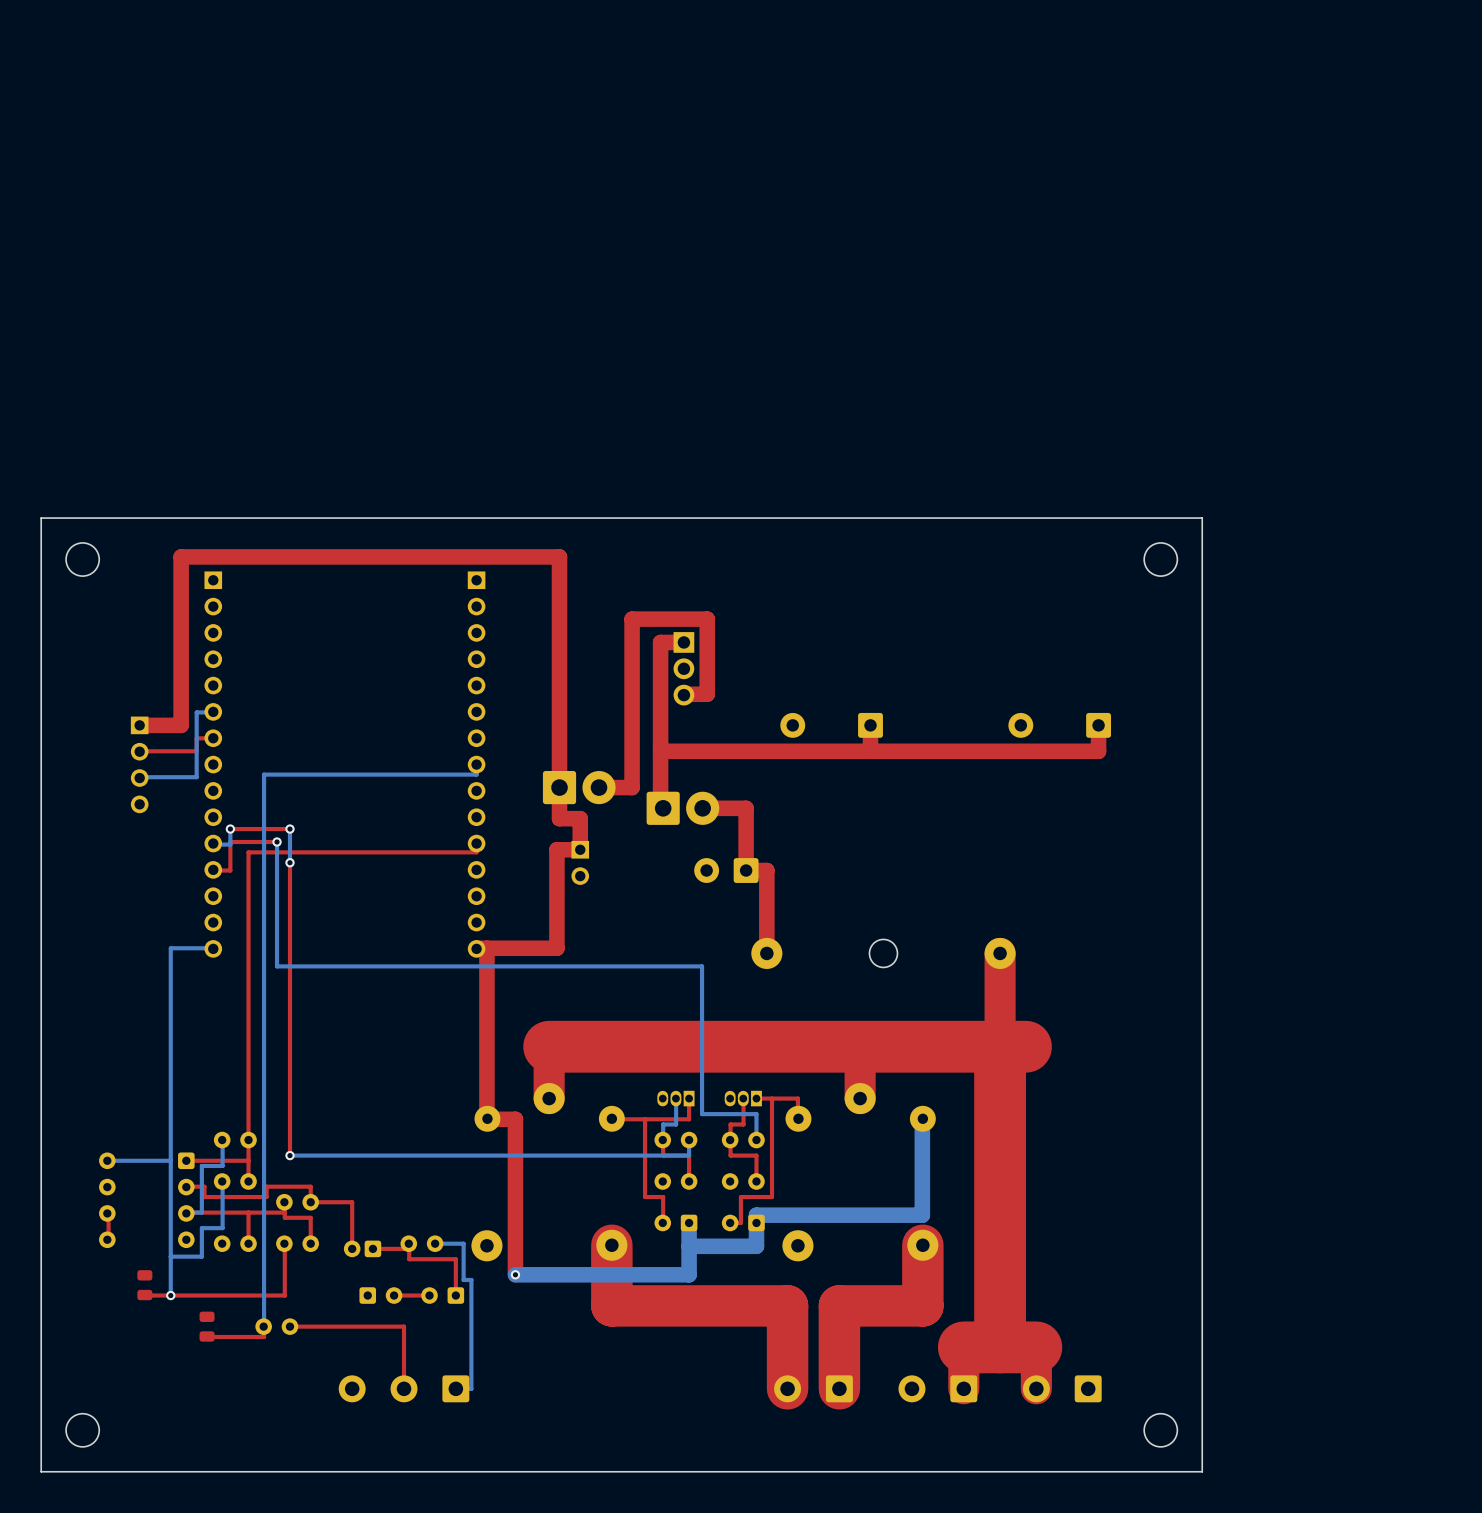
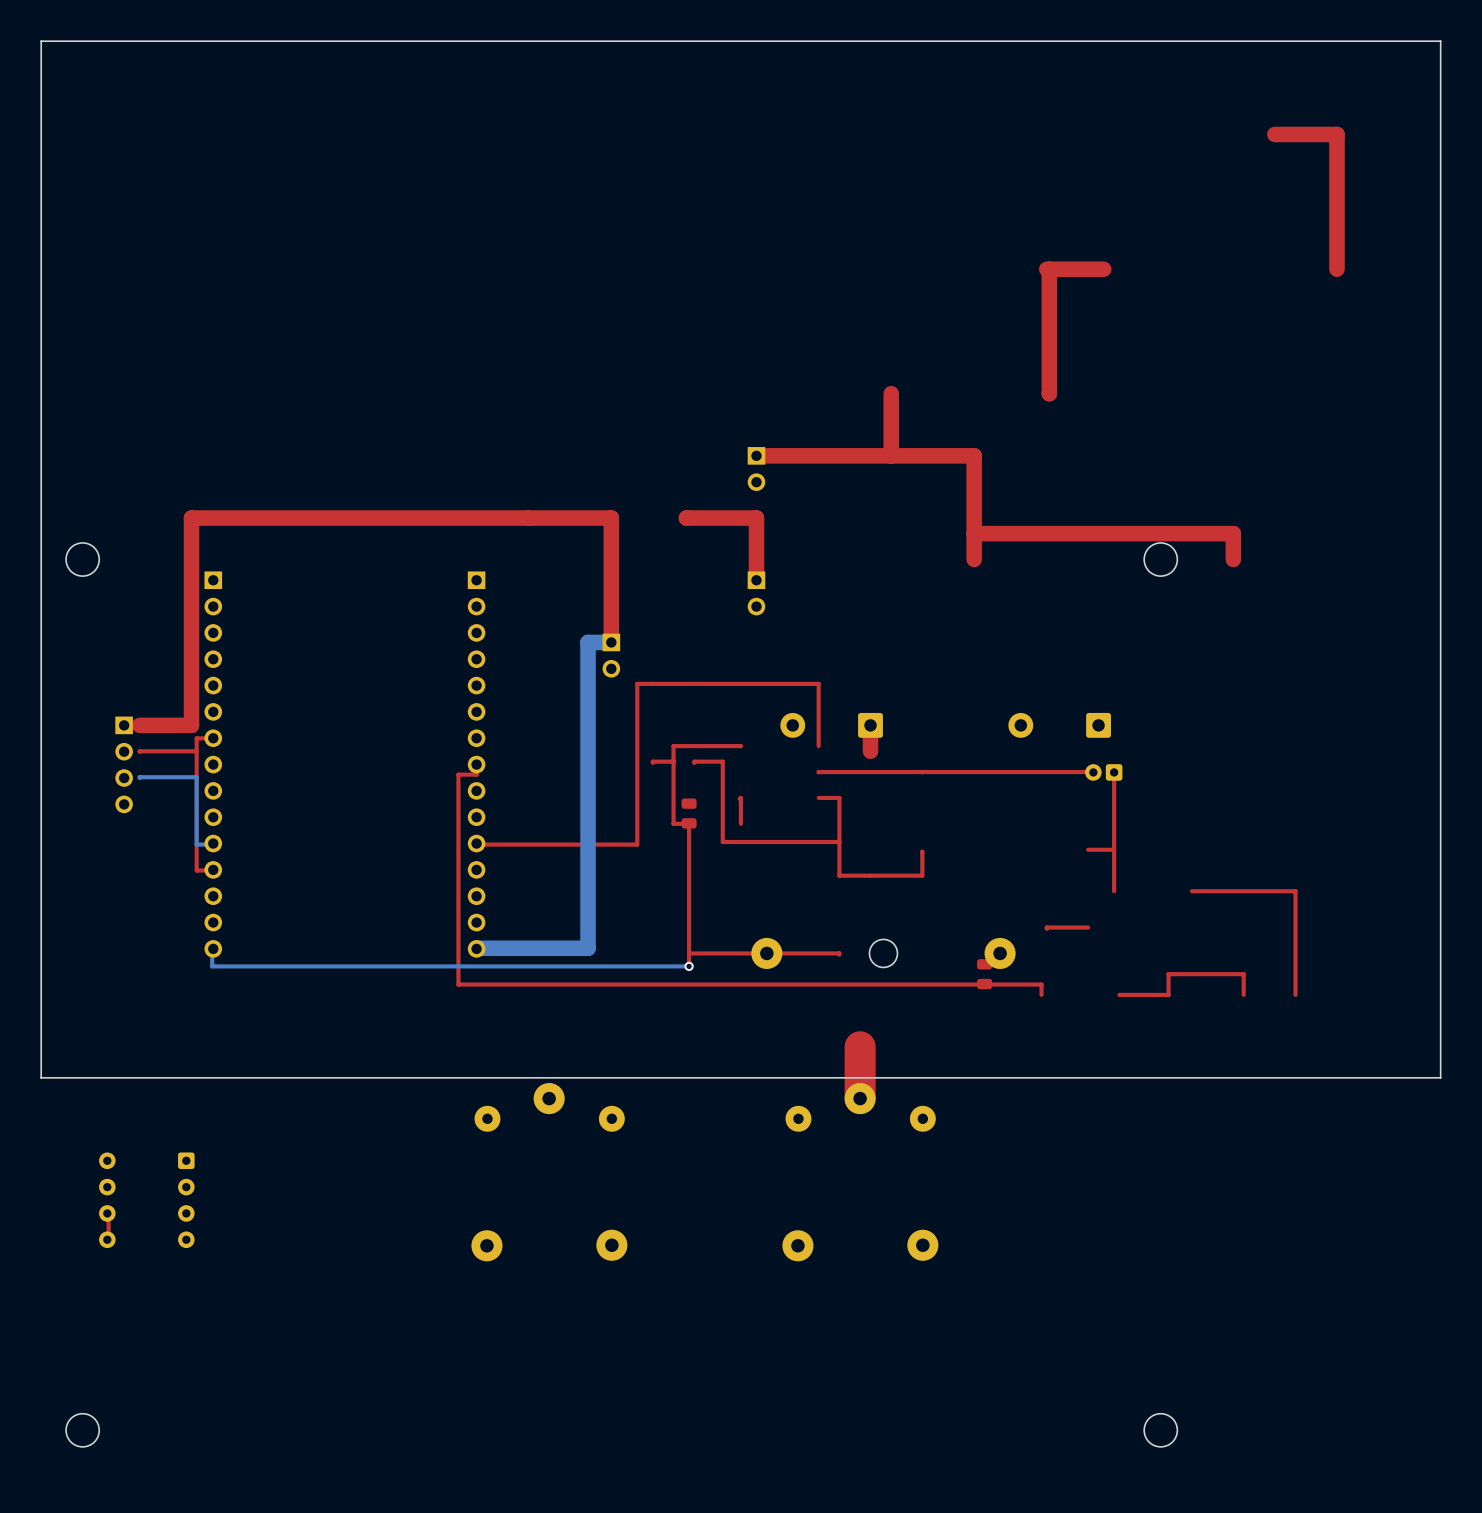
top track: none -> (1274, 134) (1337, 134) (1337, 269)
top track: none -> (1049, 269) (1049, 393)
top track: none -> (1103, 269) (1046, 269)
top track: none -> (891, 393) (891, 455)
top track: none -> (756, 455) (974, 455) (974, 559)
part: none -> (756, 469)
board edge: (41, 518) (1202, 518) (1202, 1471) (41, 1471) (41, 1077) -> (41, 518) (41, 41) (1440, 41) (1440, 1077) (41, 1077)
top track: none -> (686, 518) (756, 518) (756, 580)
top track: none -> (974, 533) (1233, 533) (1233, 559)
part: none -> (756, 593)
bottom track: none -> (611, 642) (588, 642) (588, 948) (476, 948)
top track: (683, 642) (660, 642) (660, 808) (663, 808) -> none
part: none -> (611, 655)
part: (683, 668) -> none
top track: (683, 694) (707, 694) (707, 619) (632, 619) (632, 787) (598, 787) -> none
bottom track: (212, 712) (196, 712) (196, 777) -> none
top track: (181, 725) (181, 556) (559, 556) (559, 818) (580, 818) (580, 849) (556, 849) (556, 948) (476, 948) -> (181, 725) (191, 725) (191, 518) (611, 518) (611, 642)
top track: (1098, 725) (1098, 751) (660, 751) -> none
top track: none -> (740, 746) (673, 746) (673, 823) (689, 823)
top track: none -> (673, 761) (652, 762)
top track: none -> (694, 762) (722, 761) (722, 842) (839, 842)
part position: (139, 764) -> (124, 764)
top track: none -> (476, 764) (476, 774) (458, 774) (458, 984) (1041, 984) (1041, 994)
bottom track: (476, 764) (476, 774) (264, 774) (264, 1326) -> none
top track: none -> (1093, 772) (818, 772)
part: none -> (1103, 772)
top track: none -> (1114, 772) (1114, 891)
part: (579, 787) -> none
part footprint: [646, 791, 720, 825] -> [681, 798, 697, 829]
top track: none -> (818, 797) (839, 797) (839, 875) (922, 875) (922, 851)
top track: none -> (739, 798) (740, 823)
top track: (702, 808) (746, 808) (746, 870) (766, 870) (766, 953) -> none
top track: none -> (689, 823) (689, 966)
bottom track: (230, 829) (230, 844) (212, 844) -> (196, 777) (196, 844) (212, 844)
via: (230, 829) -> none
top track: (289, 829) (230, 829) -> none
bottom track: (289, 829) (289, 862) -> none
via: (289, 829) -> none
top track: (277, 842) (230, 842) (230, 870) (212, 870) -> (196, 751) (196, 870) (212, 870)
bottom track: (277, 842) (277, 966) -> (212, 948) (212, 966) (277, 966)
via: (277, 842) -> none
top track: (476, 844) (476, 852) (248, 852) (248, 1181) -> (476, 844) (637, 844) (637, 683) (818, 683) (818, 746)
top track: none -> (1114, 849) (1088, 849)
top track: (289, 862) (289, 1155) -> none
via: (289, 862) -> none
part: (580, 862) -> none
part: (726, 870) -> none
top track: none -> (1191, 891) (1295, 891) (1295, 994)
top track: none -> (1088, 927) (1046, 928)
bottom track: (212, 948) (170, 948) (170, 1295) -> none
top track: (486, 948) (486, 1119) -> none
top track: none -> (689, 953) (839, 954)
top track: (1000, 953) (1000, 1347) -> none
bottom track: (689, 966) (702, 966) (702, 1114) (756, 1114) (756, 1140) -> none
via: none -> (689, 966)
part: none -> (984, 974)
top track: none -> (1243, 994) (1243, 974) (1168, 974) (1168, 994) (1119, 994)
top track: (1026, 1046) (549, 1046) (549, 1098) -> none
part: (675, 1098) -> none
bottom track: (676, 1098) (676, 1124) (663, 1124) (663, 1140) -> none
top track: (689, 1098) (689, 1119) (611, 1119) -> none
top track: (743, 1098) (743, 1124) (730, 1124) (730, 1155) (756, 1155) (756, 1181) -> none
part: (743, 1098) -> none
top track: (756, 1098) (797, 1098) (797, 1119) -> none
top track: (772, 1098) (772, 1197) (740, 1197) (740, 1222) (730, 1222) -> none
bottom track: (922, 1118) (922, 1215) (756, 1215) (756, 1246) (689, 1246) -> none
top track: (486, 1119) (515, 1119) (515, 1274) -> none
top track: (645, 1119) (645, 1197) (663, 1197) (662, 1222) -> none
bottom track: (222, 1140) (222, 1165) (201, 1165) (201, 1212) (186, 1212) -> none
part: (235, 1140) -> none
top track: (663, 1140) (663, 1155) (689, 1155) (689, 1181) -> none
part: (675, 1140) -> none
bottom track: (689, 1140) (689, 1155) (289, 1155) -> none
part: (743, 1140) -> none
via: (289, 1155) -> none
bottom track: (170, 1160) (107, 1160) -> none
top track: (248, 1160) (186, 1160) -> none
bottom track: (222, 1181) (222, 1228) (201, 1228) (201, 1256) (170, 1256) -> none
part: (235, 1181) -> none
part: (675, 1181) -> none
part: (743, 1181) -> none
top track: (186, 1187) (204, 1186) (204, 1197) (266, 1197) (266, 1186) (310, 1186) (310, 1202) (352, 1202) (352, 1248) -> none
top track: (284, 1202) (284, 1217) (310, 1217) (310, 1243) -> none
part: (297, 1202) -> none
top track: (248, 1212) (248, 1243) -> none
top track: (284, 1212) (186, 1212) -> none
part: (675, 1222) -> none
bottom track: (689, 1222) (689, 1274) (515, 1274) -> none
part: (743, 1222) -> none
part: (235, 1243) -> none
top track: (284, 1243) (284, 1295) (144, 1295) -> none
part: (297, 1243) -> none
top track: (409, 1243) (409, 1259) (455, 1259) (455, 1295) -> none
part: (421, 1243) -> none
bottom track: (435, 1243) (463, 1243) (463, 1279) (471, 1279) (471, 1388) (455, 1388) -> none
top track: (611, 1245) (611, 1305) (787, 1305) (787, 1388) -> none
top track: (922, 1245) (922, 1305) (839, 1305) (839, 1388) -> none
part: (362, 1248) -> none
top track: (409, 1248) (372, 1248) -> none
via: (515, 1274) -> none
part: (144, 1285) -> none
via: (170, 1295) -> none
part: (380, 1295) -> none
top track: (429, 1295) (393, 1295) -> none
part: (442, 1295) -> none
part: (207, 1326) -> none
top track: (264, 1326) (264, 1337) (207, 1336) -> none
part: (276, 1326) -> none
top track: (289, 1326) (404, 1326) (404, 1388) -> none
part: (404, 1388) -> none
part: (813, 1388) -> none
part: (937, 1388) -> none
top track: (1036, 1388) (1036, 1347) (963, 1347) (963, 1388) -> none
part: (1062, 1388) -> none

